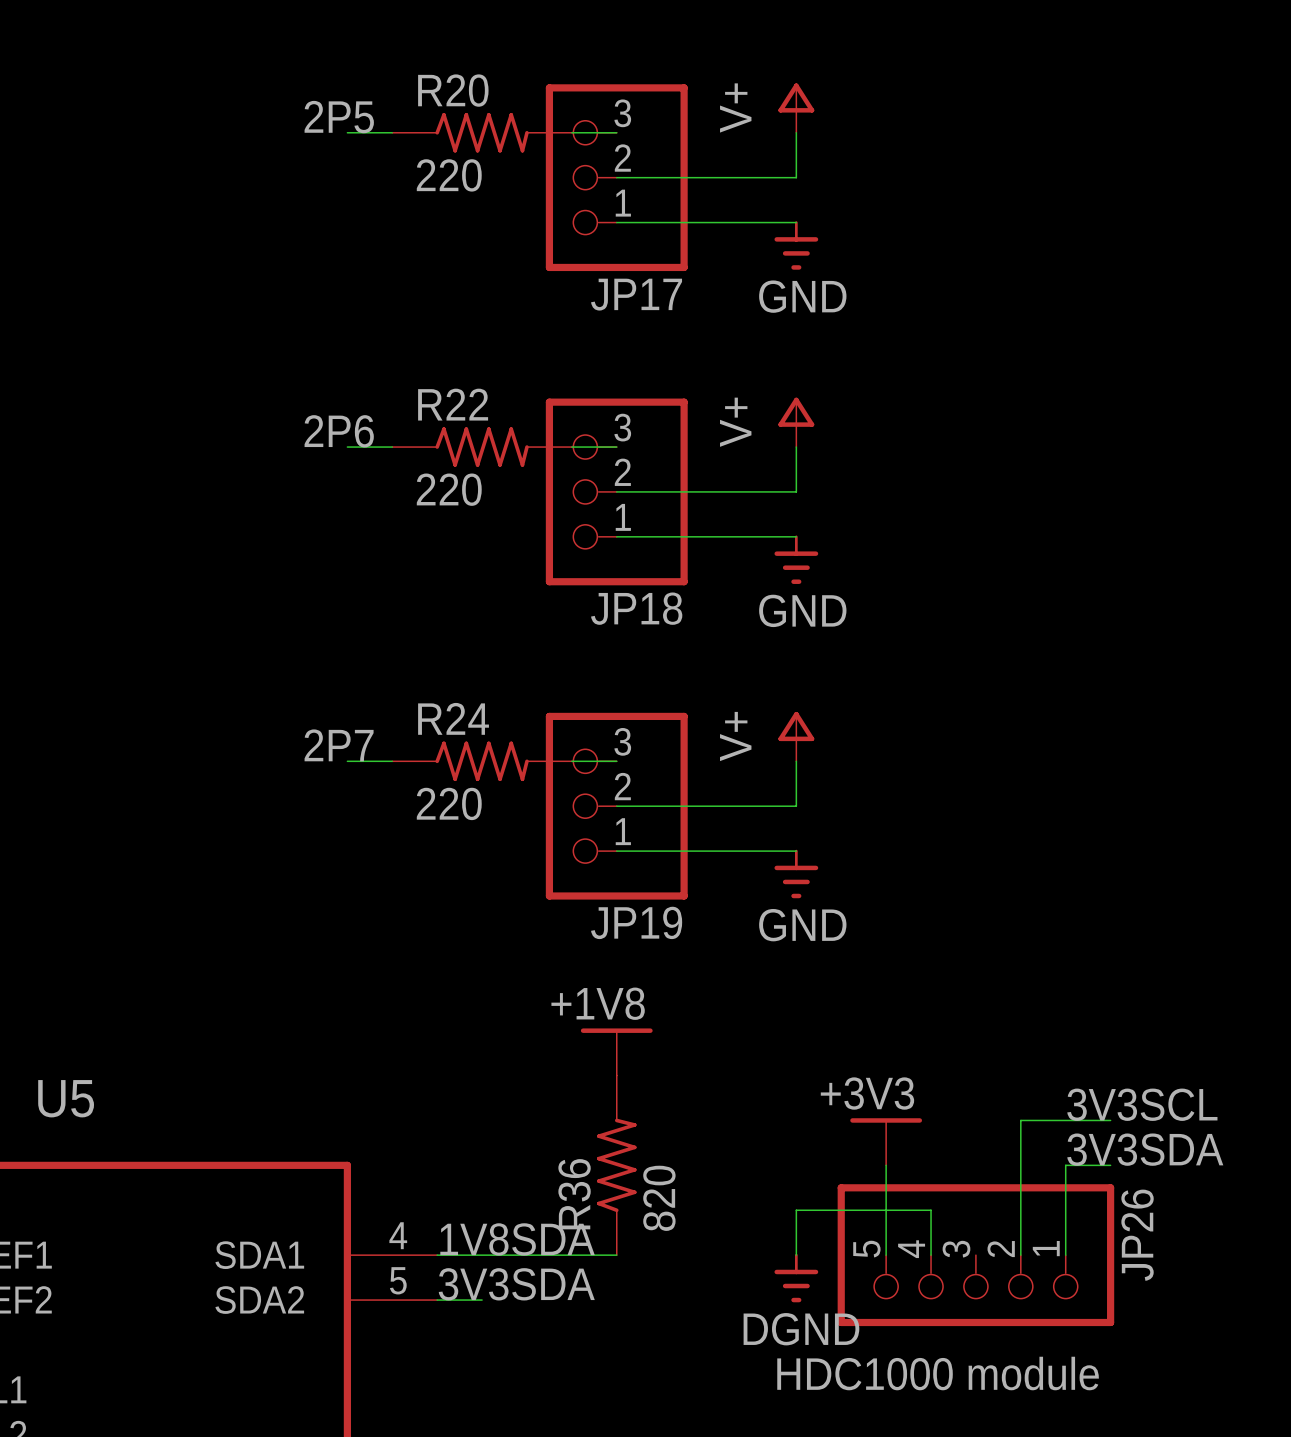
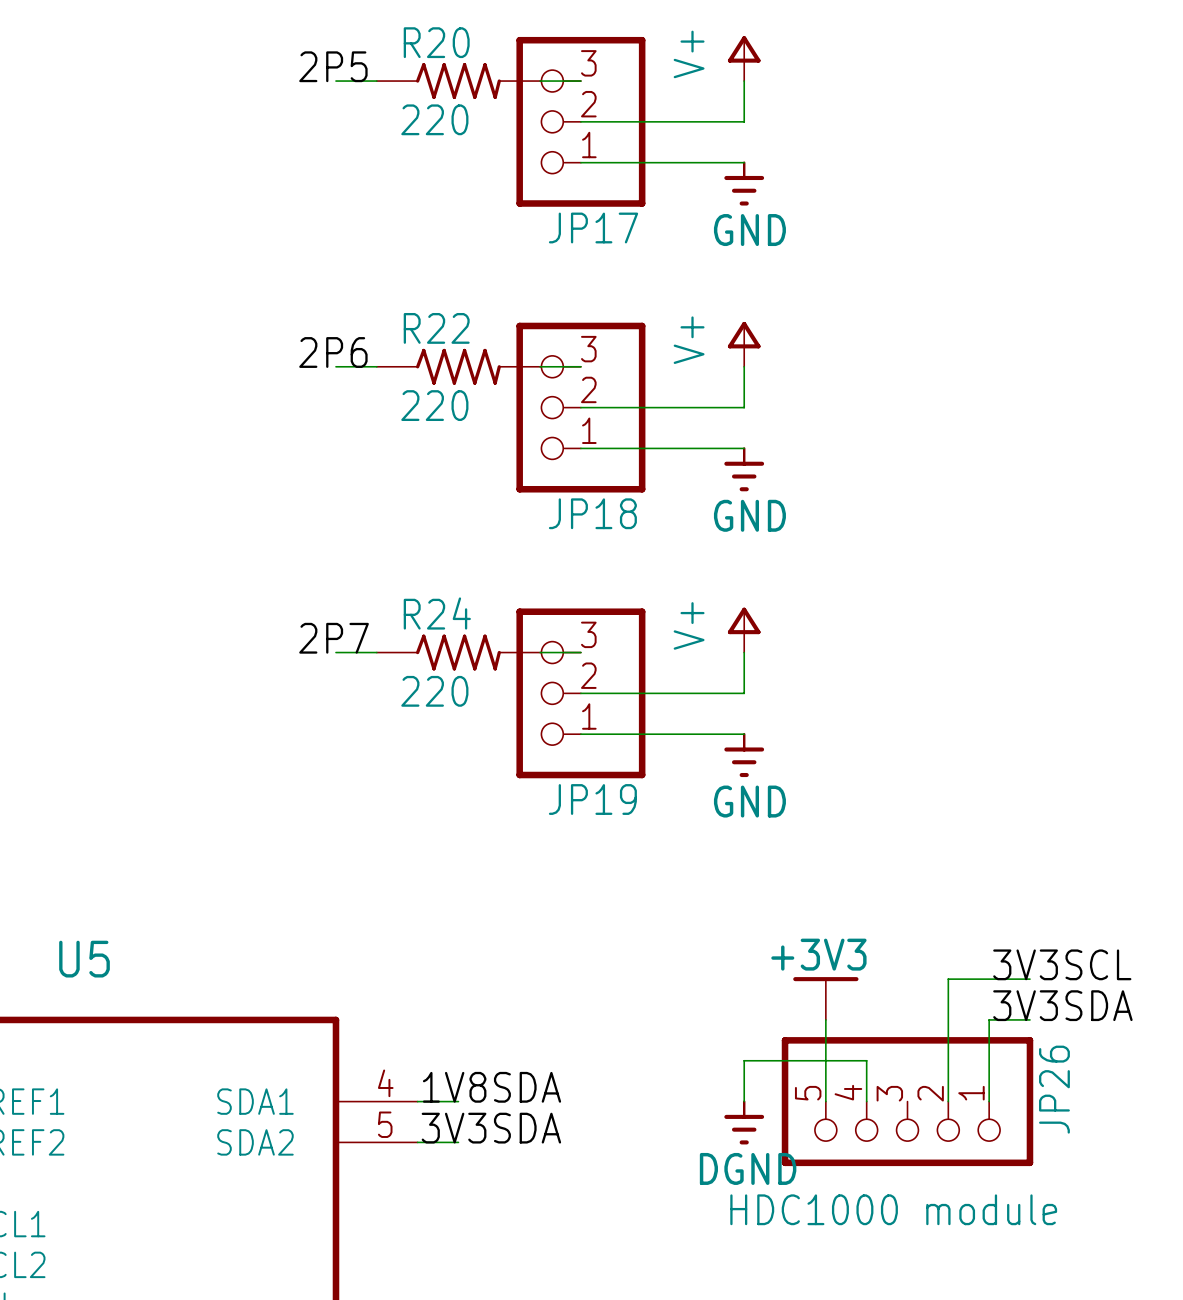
power symbol: +1V8 (616, 1052) -> none
R36: 820 (616, 1165) -> none
wire: (482, 1255) (616, 1255) -> none

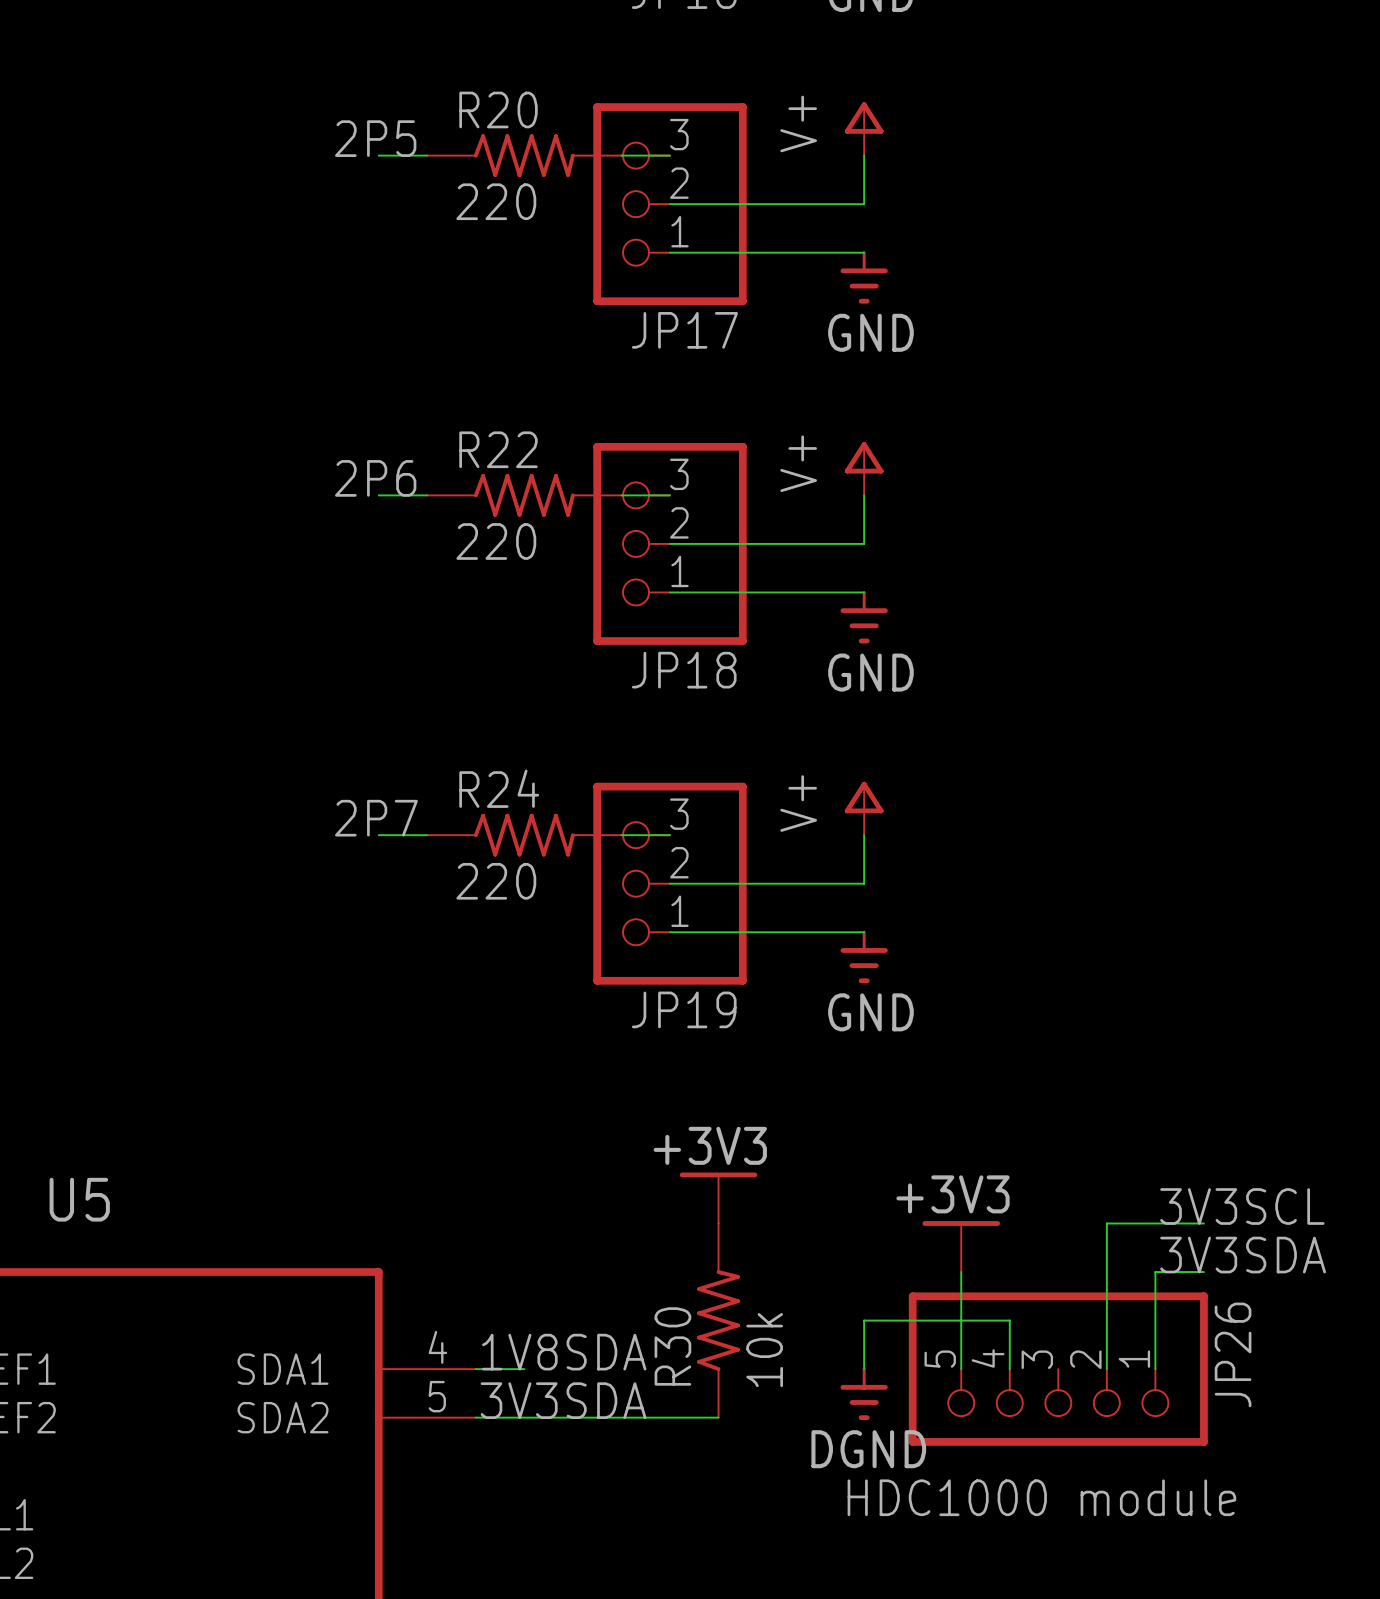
power symbol: none -> +3V3 (718, 1198)
R30: none -> 10k (718, 1320)
wire: none -> (524, 1417) (718, 1417)

